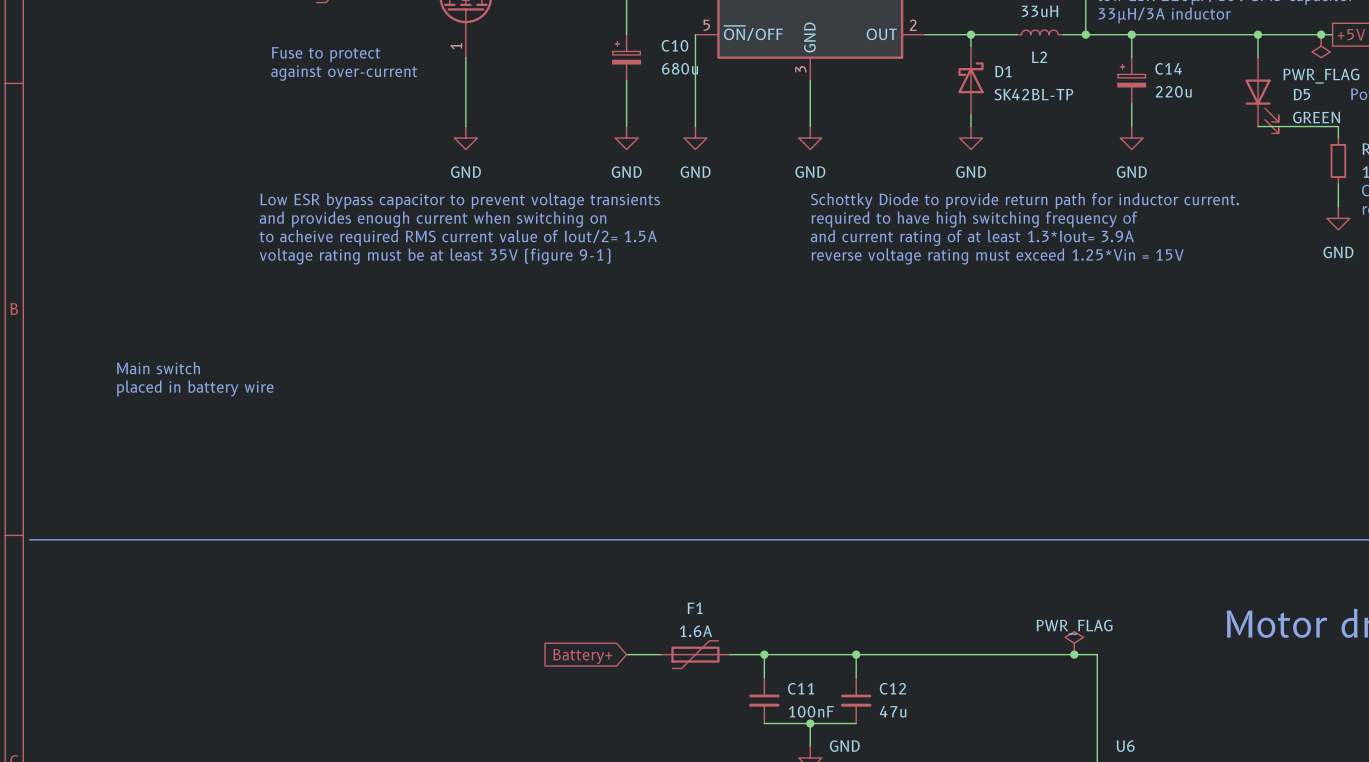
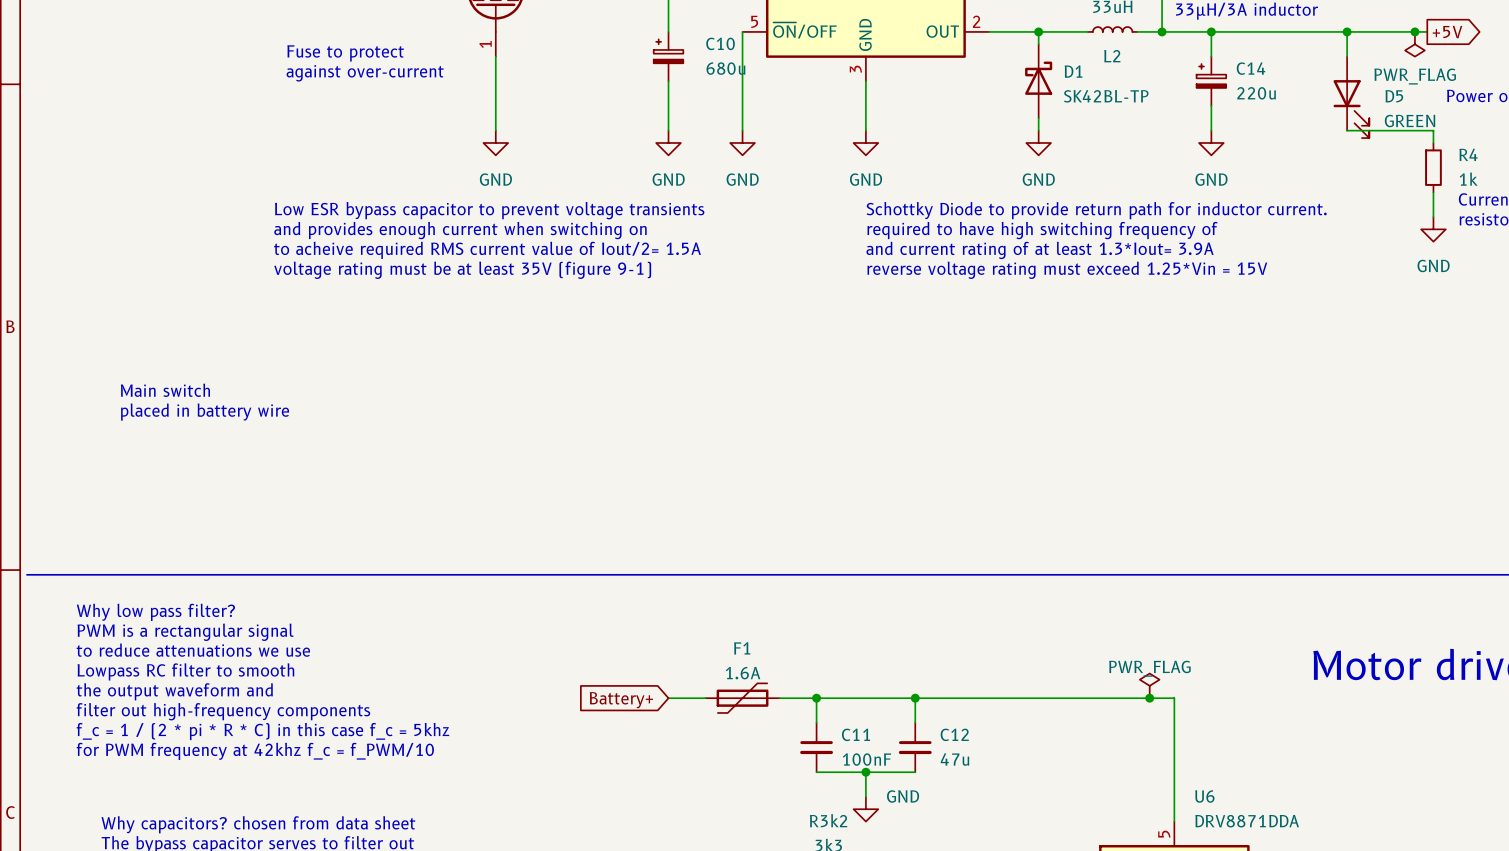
text: none -> Why low pass filter? (155, 612)
text: none -> PWM is a rectangular signal (185, 632)
text: none -> to reduce attenuations we use (193, 650)
text: none -> Lowpass RC filter to smooth (185, 671)
text: none -> the output waveform and (174, 691)
text: none -> filter out high-frequency components (223, 711)
text: none -> f_c = 1 / (2 * pi * R * C) in this case f_c = 5khz (262, 731)
text: none -> for PWM frequency at 42khz f_c = f_PWM/10 (255, 751)

